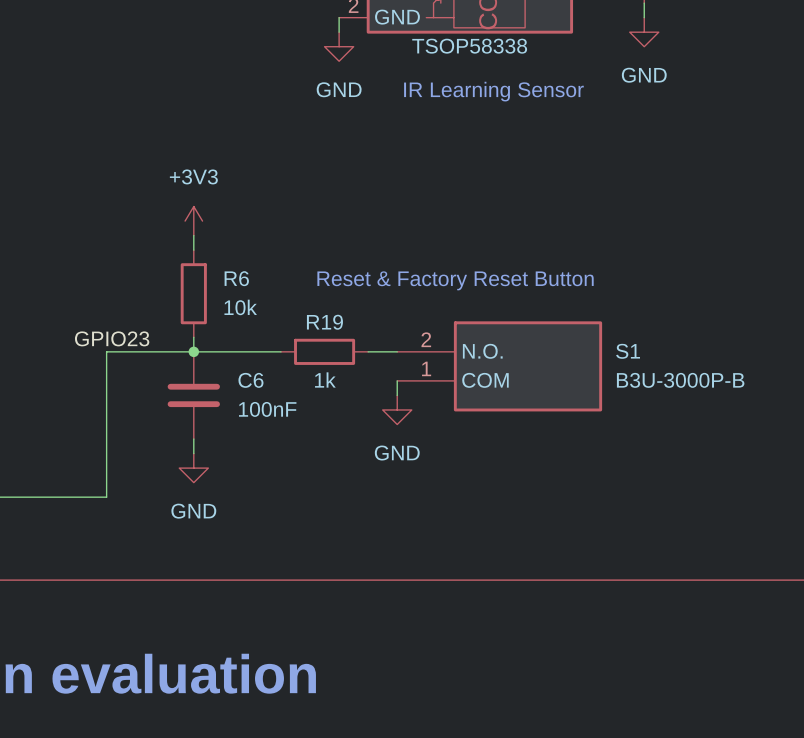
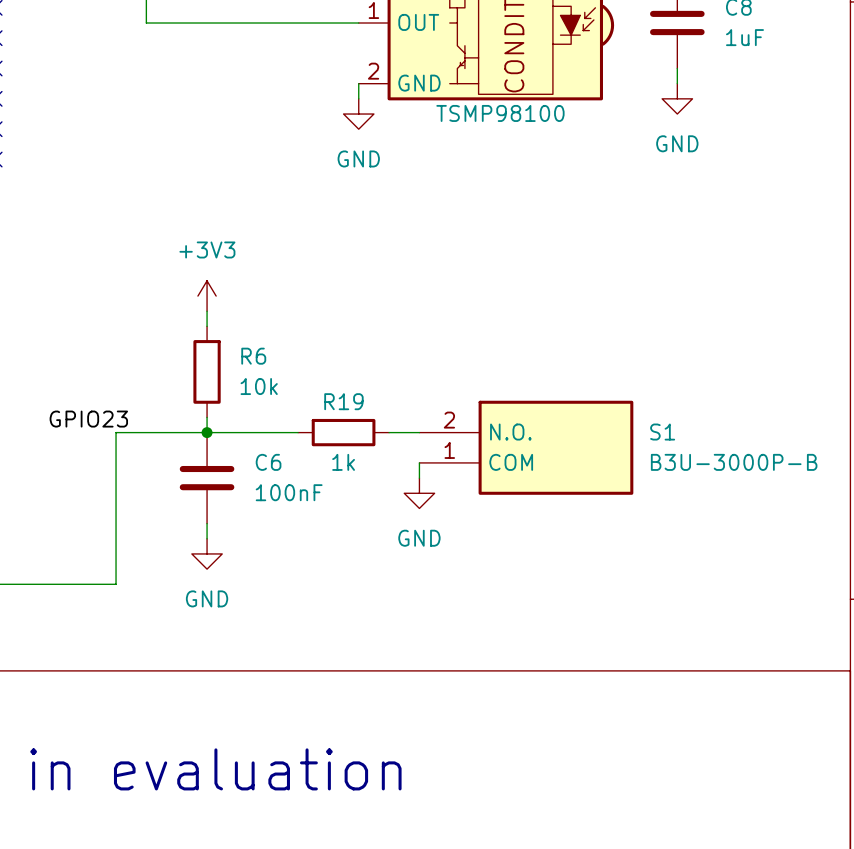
part value: TSOP58338 (469, 46) -> TSMP98100 (500, 113)
text: IR Learning Sensor (493, 91) -> none
text: Reset & Factory Reset Button (455, 280) -> none
label position: GPIO23 (112, 338) -> GPIO23 (88, 419)

